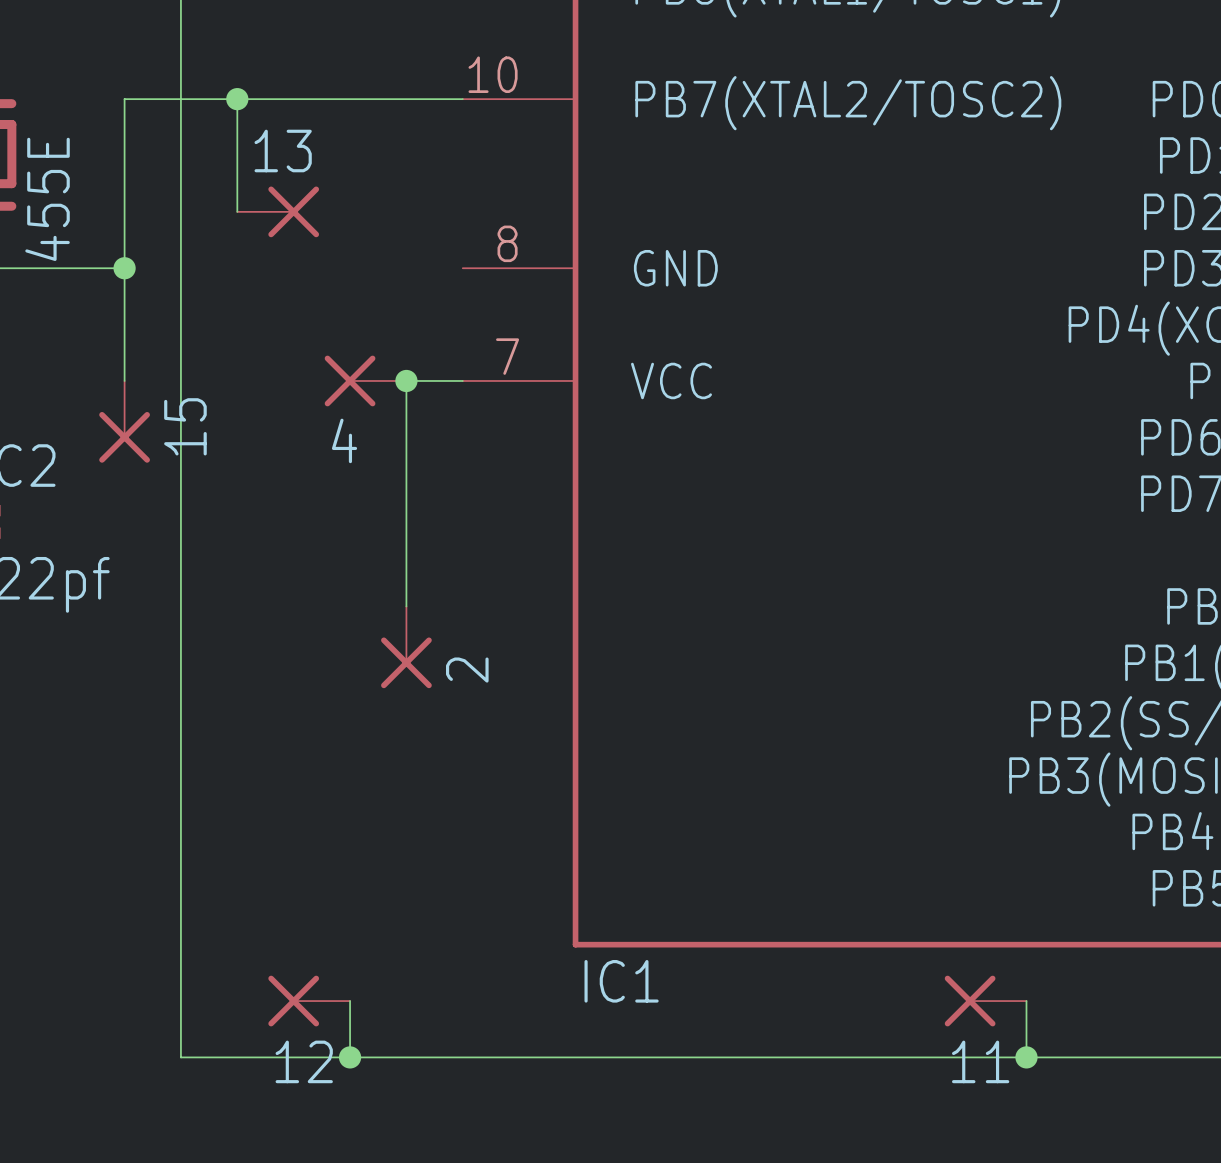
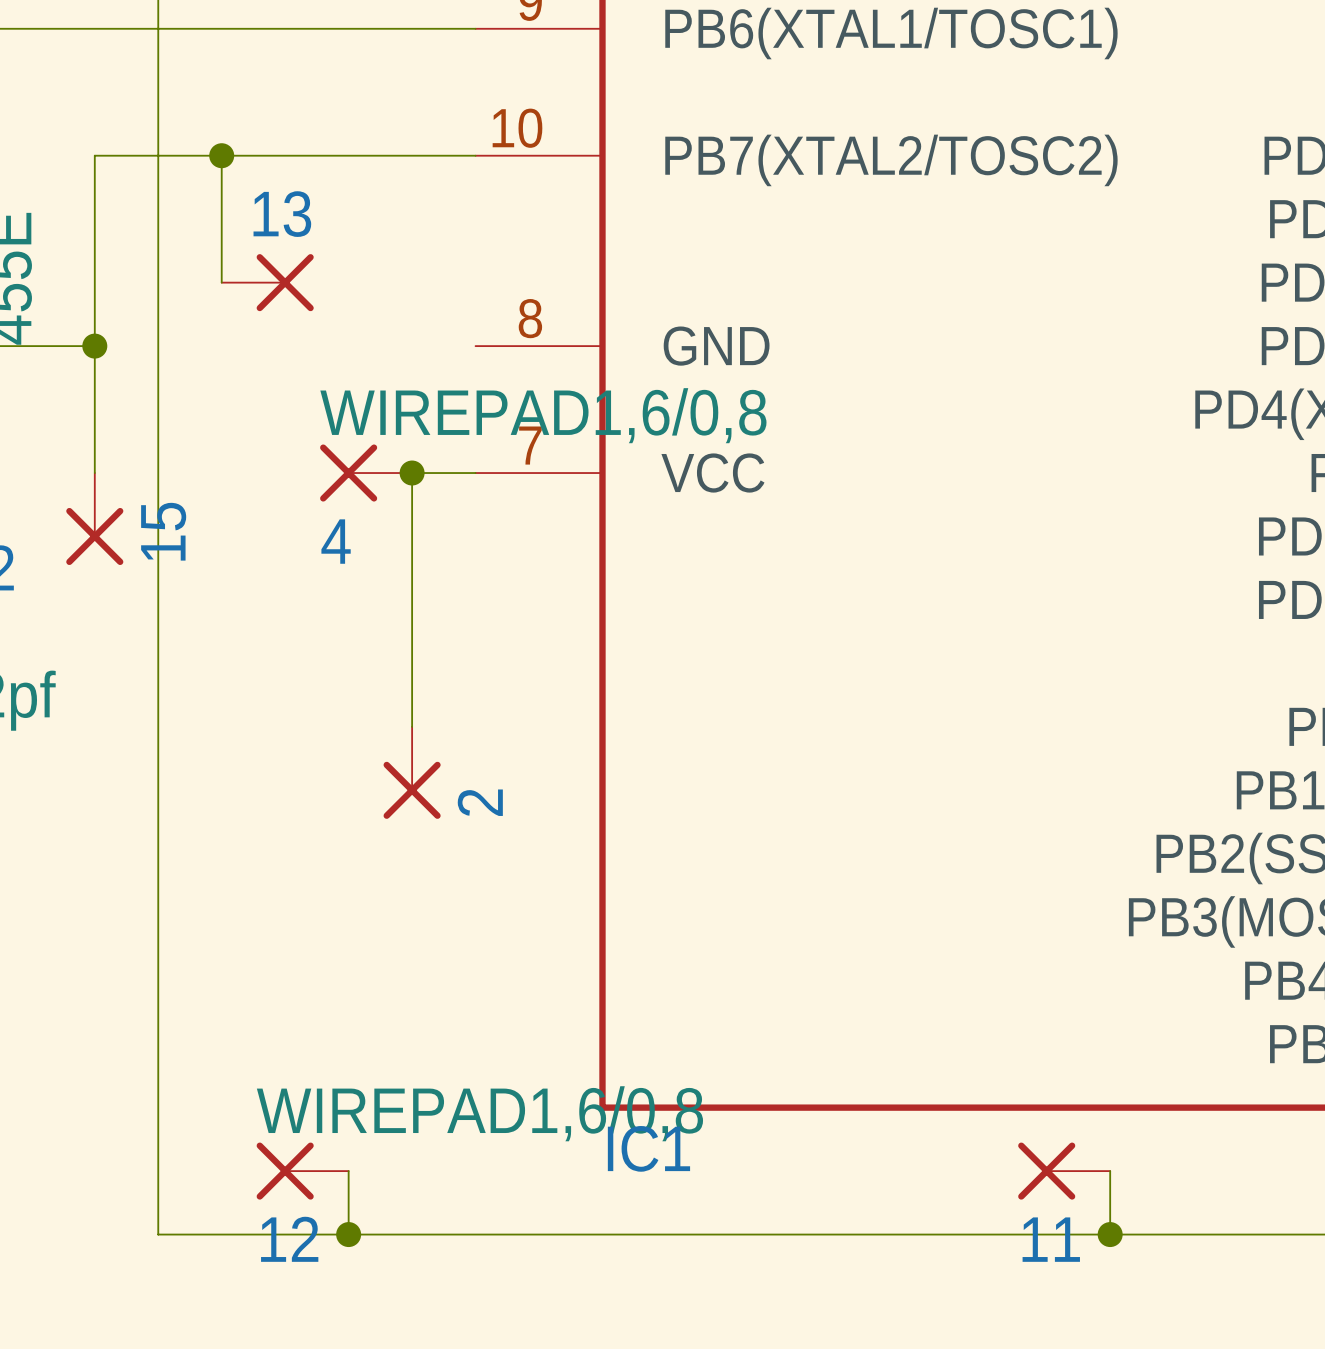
4 value: none -> WIREPAD1,6/0,8 (543, 415)
12 value: none -> WIREPAD1,6/0,8 (479, 1113)

